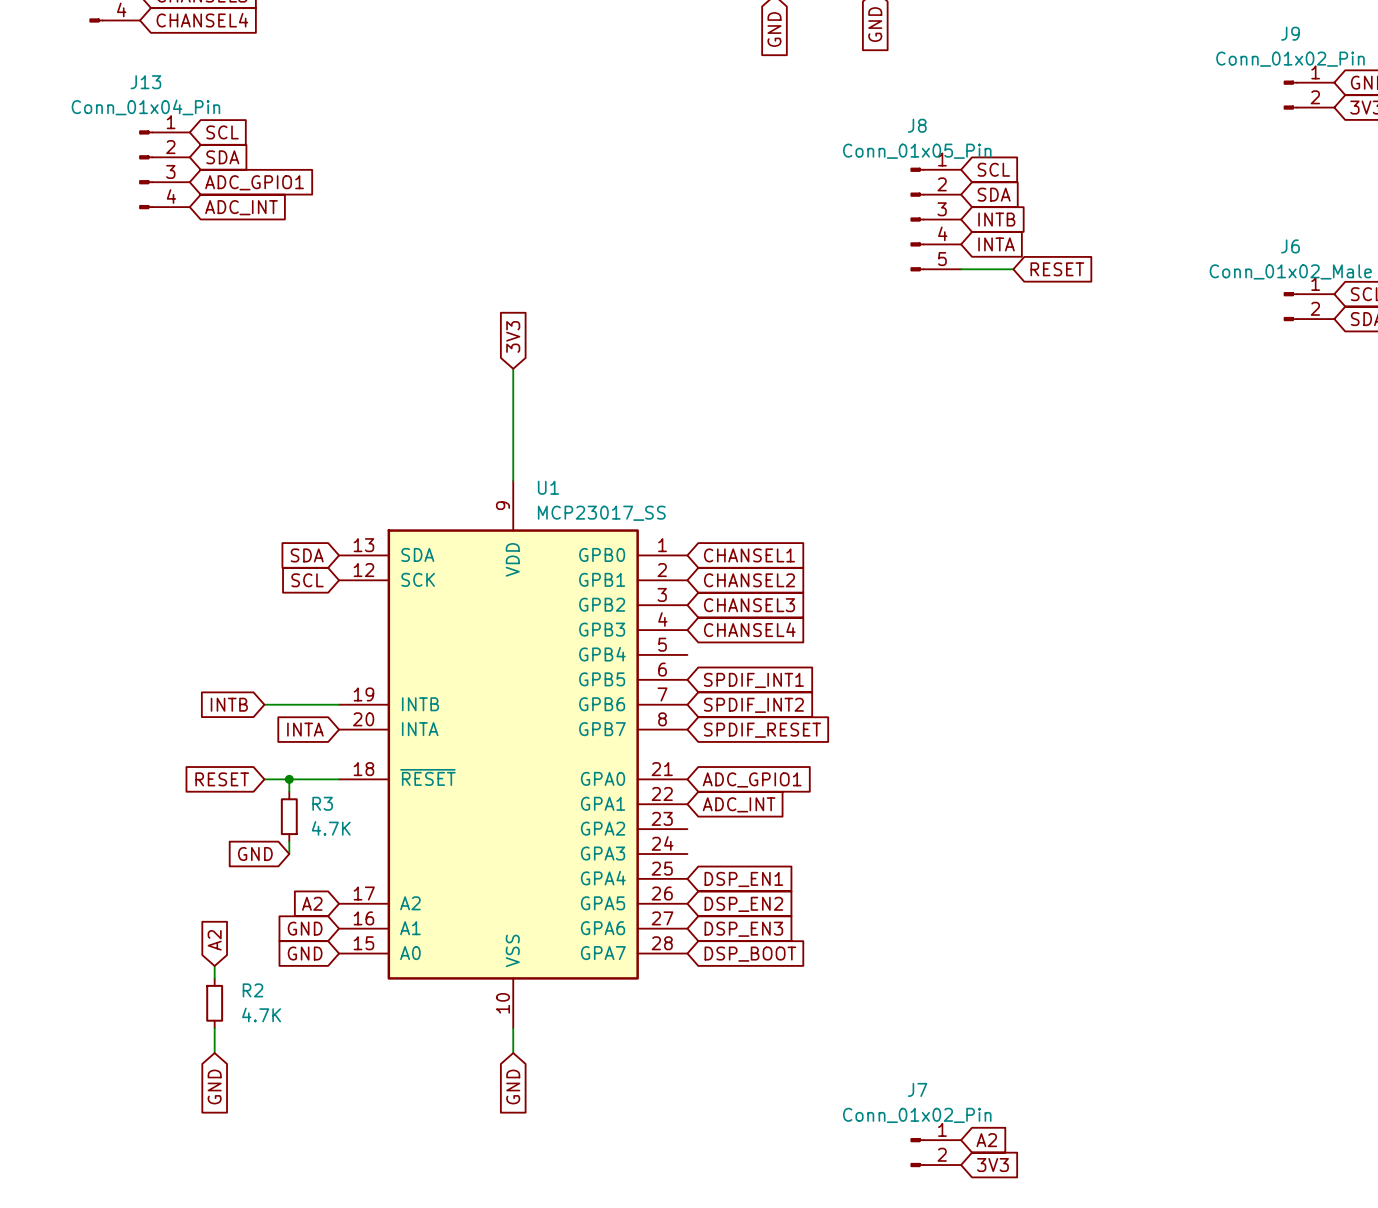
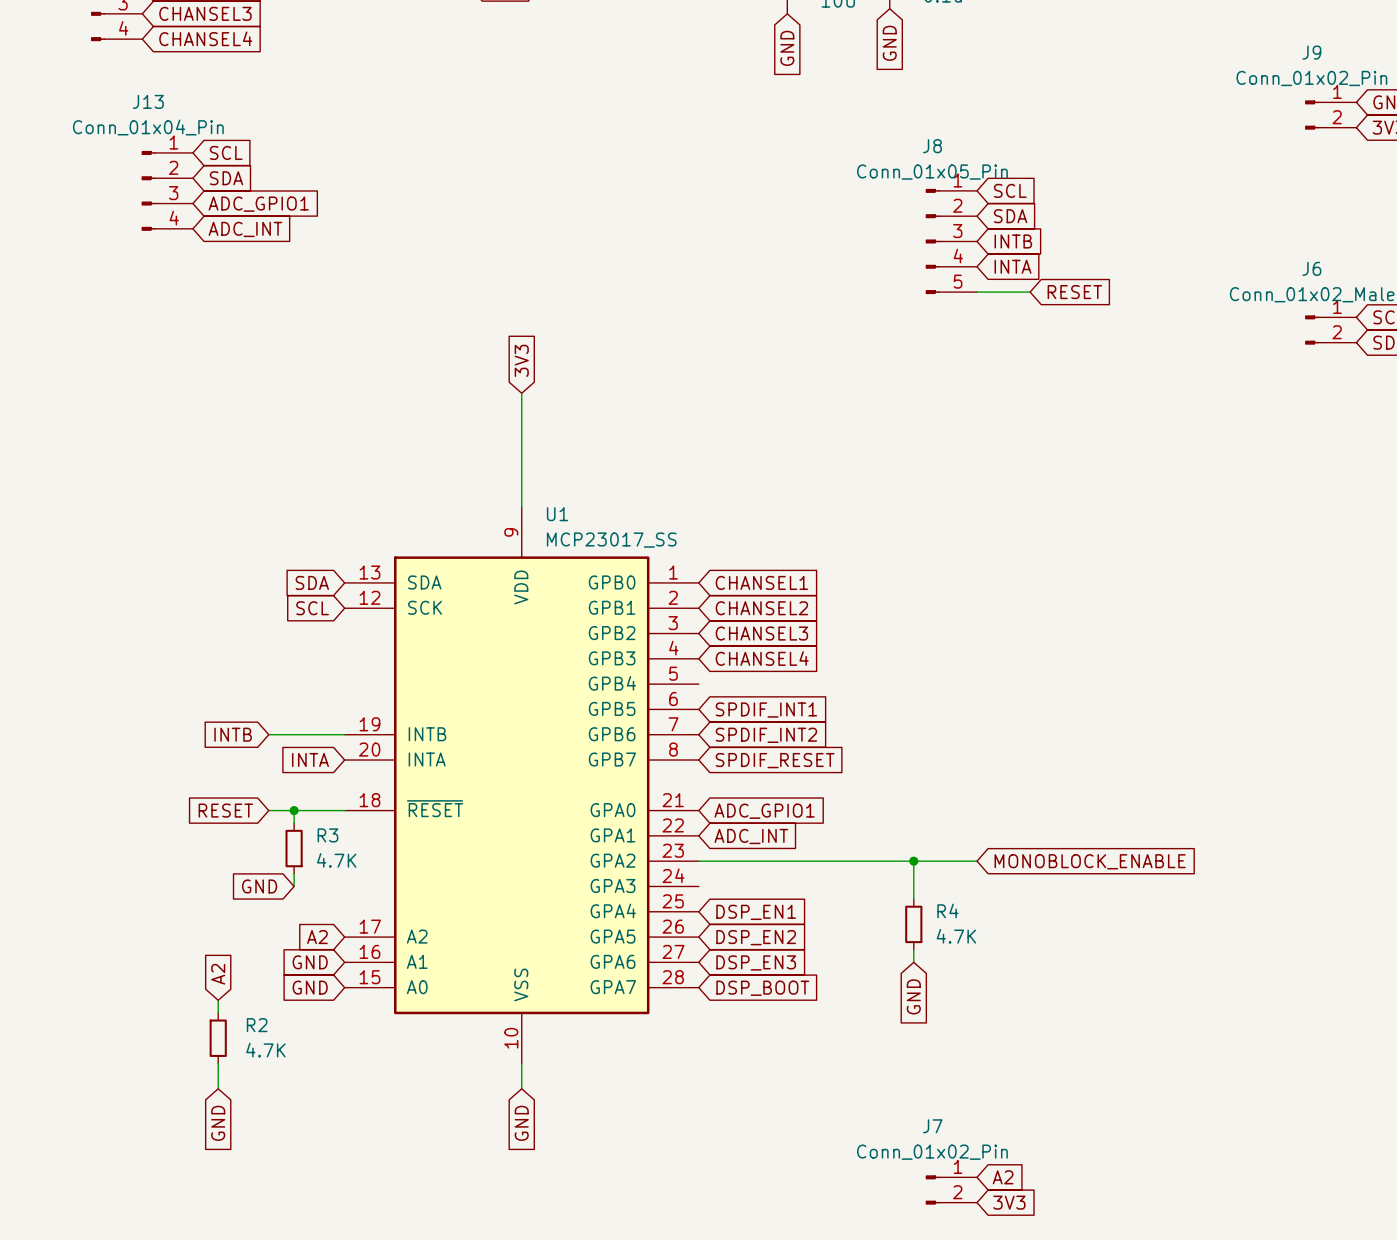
wire: none -> (698, 861) (977, 861)
wire: none -> (913, 861) (913, 899)
junction: none -> (913, 861)
global label: none -> MONOBLOCK_ENABLE (1090, 861)
R4: none -> 4.7K (913, 924)
wire: none -> (913, 949) (913, 962)
global label: none -> GND (913, 996)

